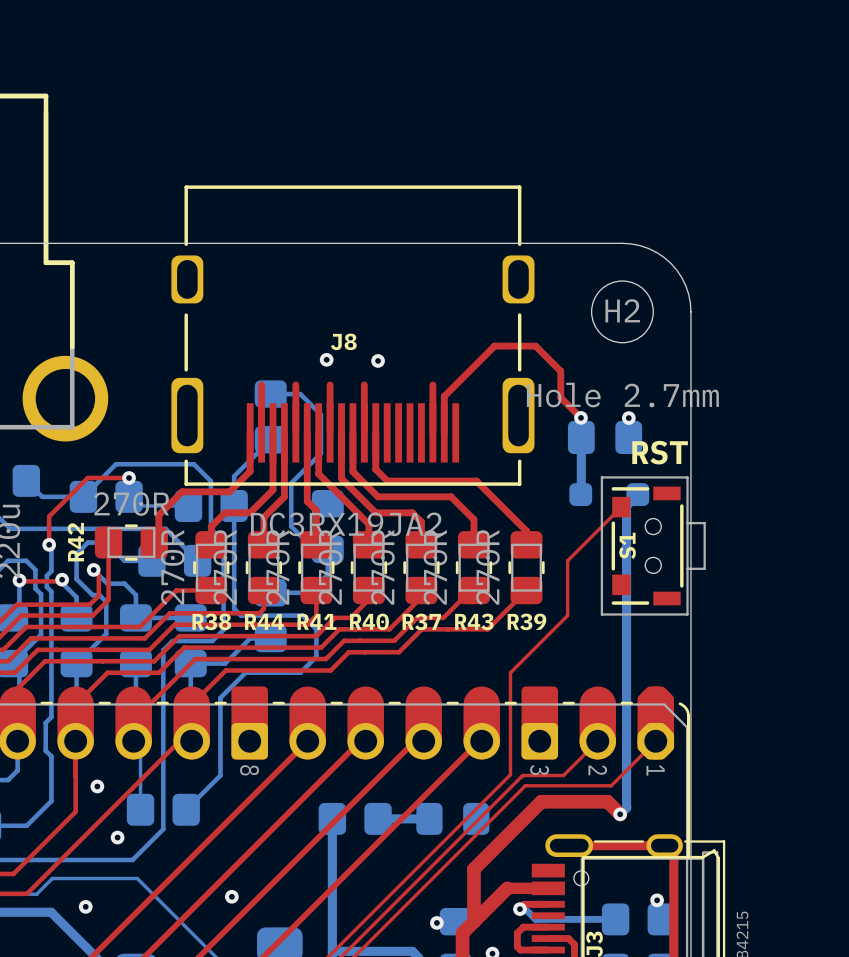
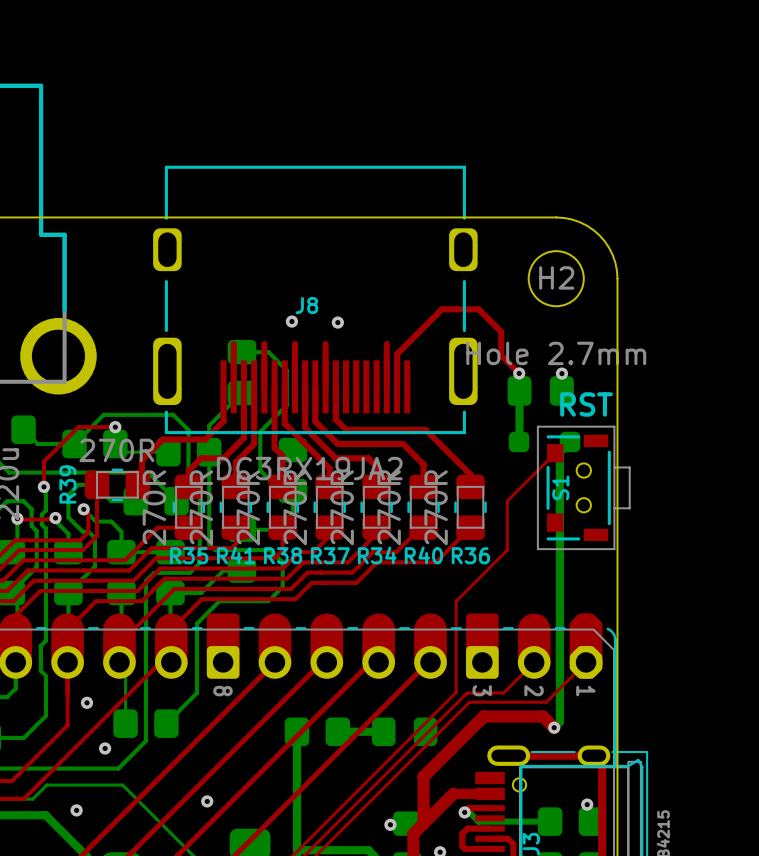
R42 name: R42 (75, 542) -> R39 (67, 484)
R38 name: R38 (211, 621) -> R35 (189, 555)
R44 name: R44 (264, 621) -> R41 (236, 555)
R41 name: R41 (317, 621) -> R38 (283, 555)
R40 name: R40 (369, 621) -> R37 (330, 555)
R37 name: R37 (421, 621) -> R34 (377, 555)
R43 name: R43 (474, 621) -> R40 (423, 555)
R39 name: R39 (526, 621) -> R36 (470, 555)

